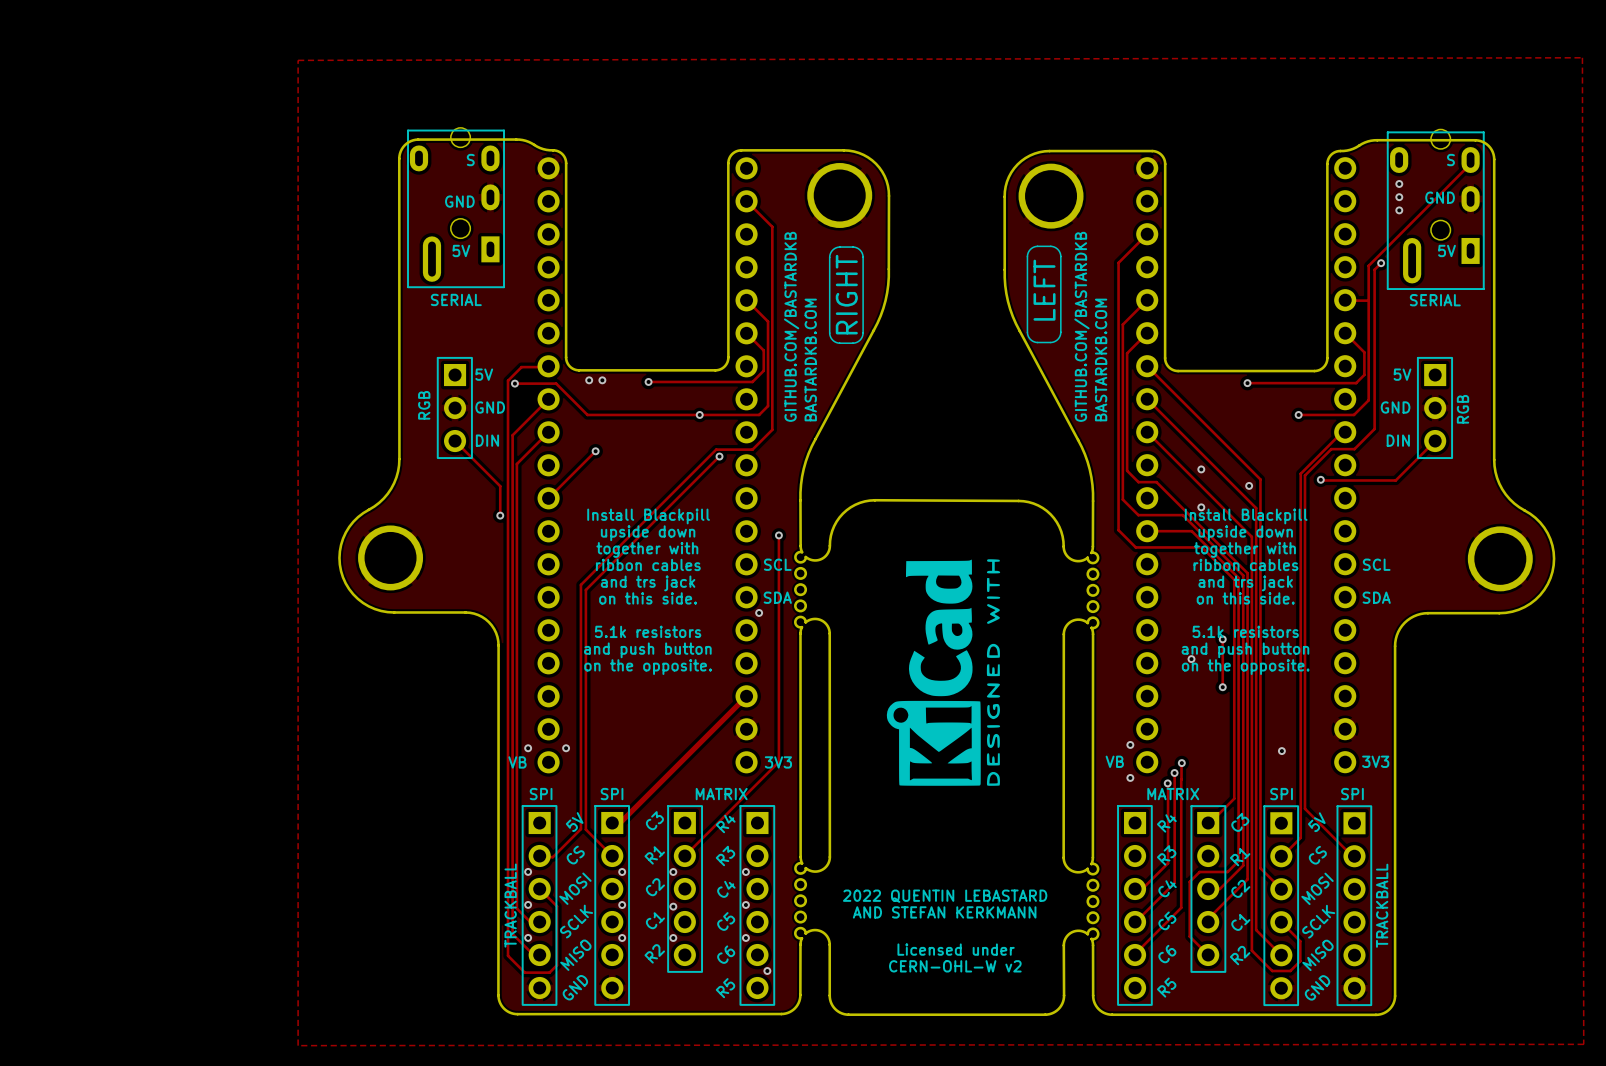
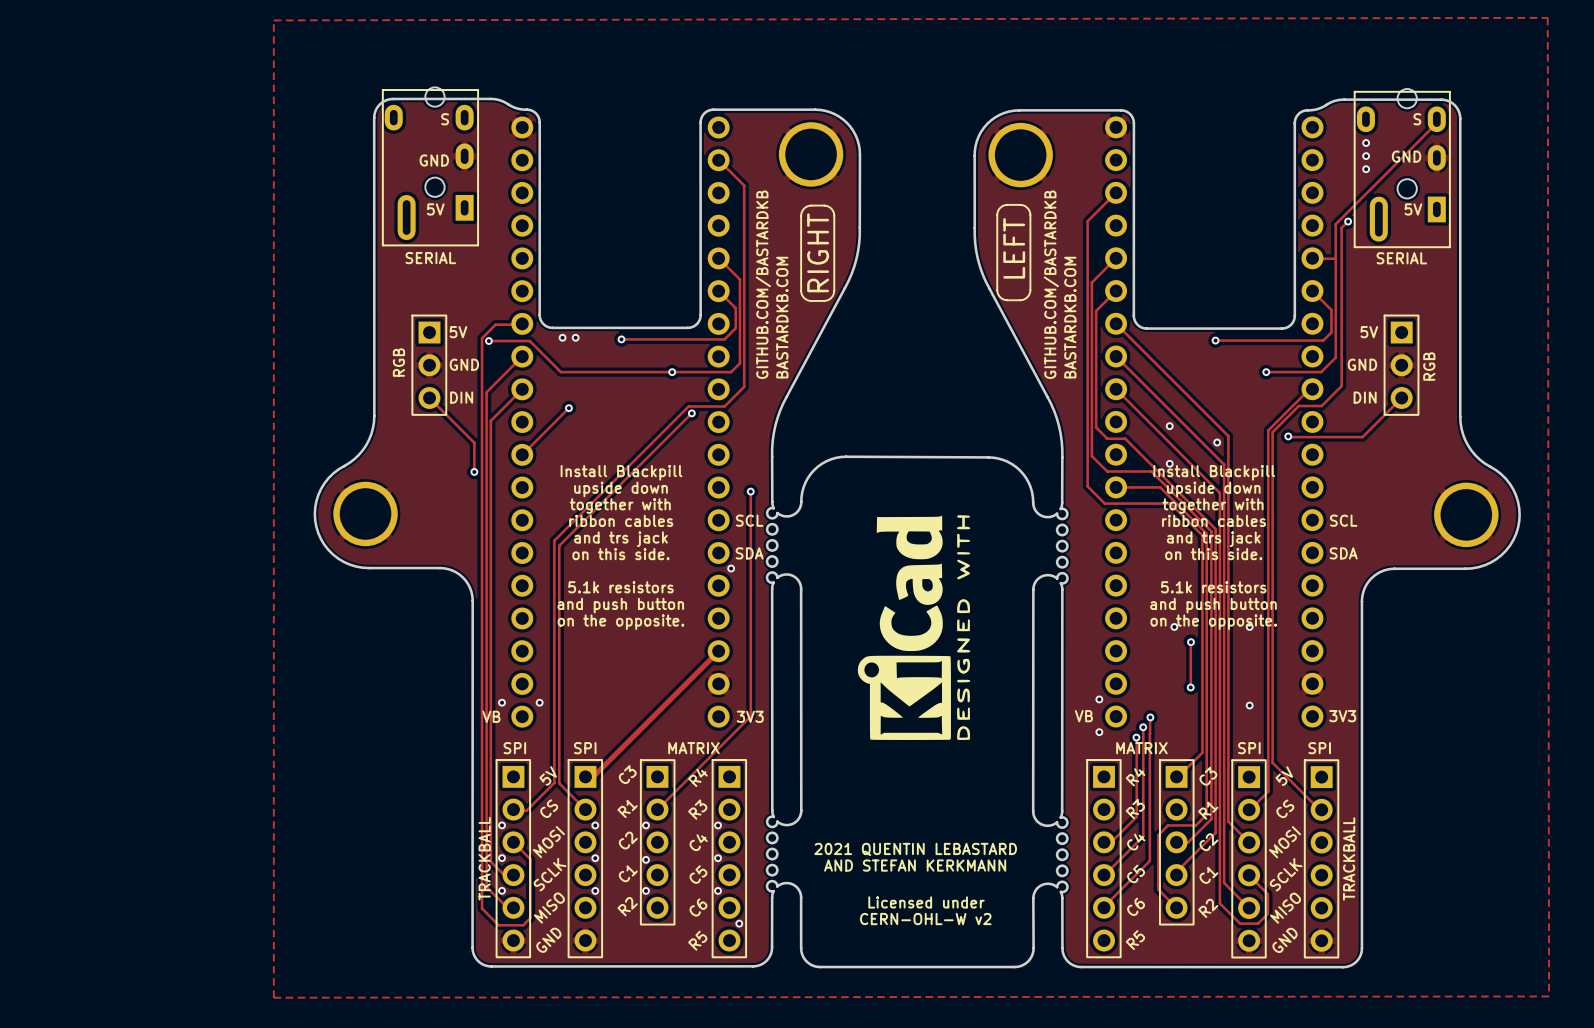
track: (1222, 639) (1222, 687) -> none
via: (1222, 639) -> none
via: (1191, 659) -> none
via: none -> (1174, 626)
via: none -> (1249, 626)
track: none -> (1190, 641) (1190, 687)
via: none -> (1190, 687)
text: 2022 QUENTIN LEBASTARD (945, 896) -> 2021 QUENTIN LEBASTARD (915, 849)

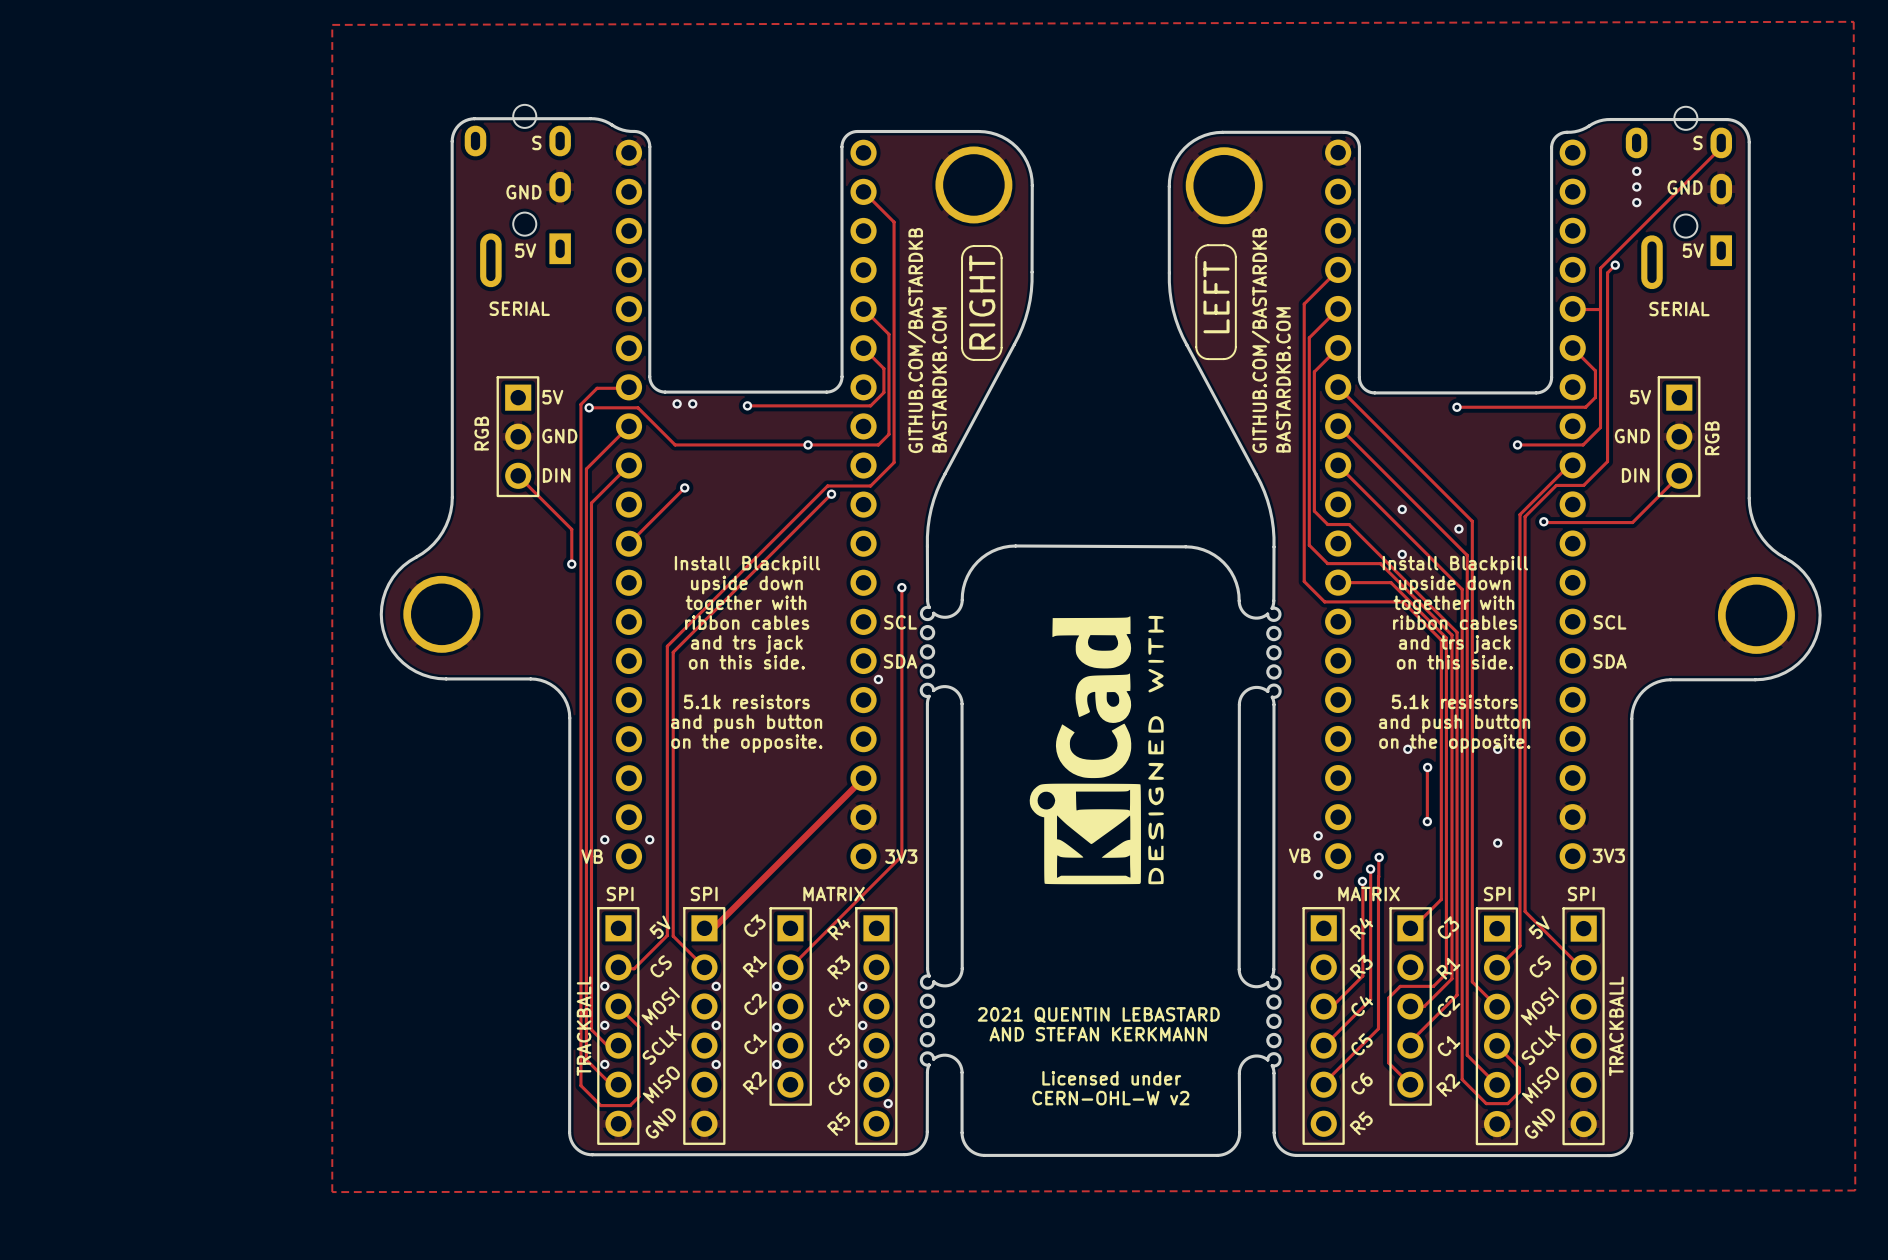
line: (382, 90) (478, 90) (478, 245) (382, 245) (382, 90) -> none
line: (1354, 91) (1449, 91) (1449, 247) (1354, 247) (1354, 91) -> none
track: (1116, 192) (1087, 221) (1087, 254) -> (1338, 270) (1304, 304)

